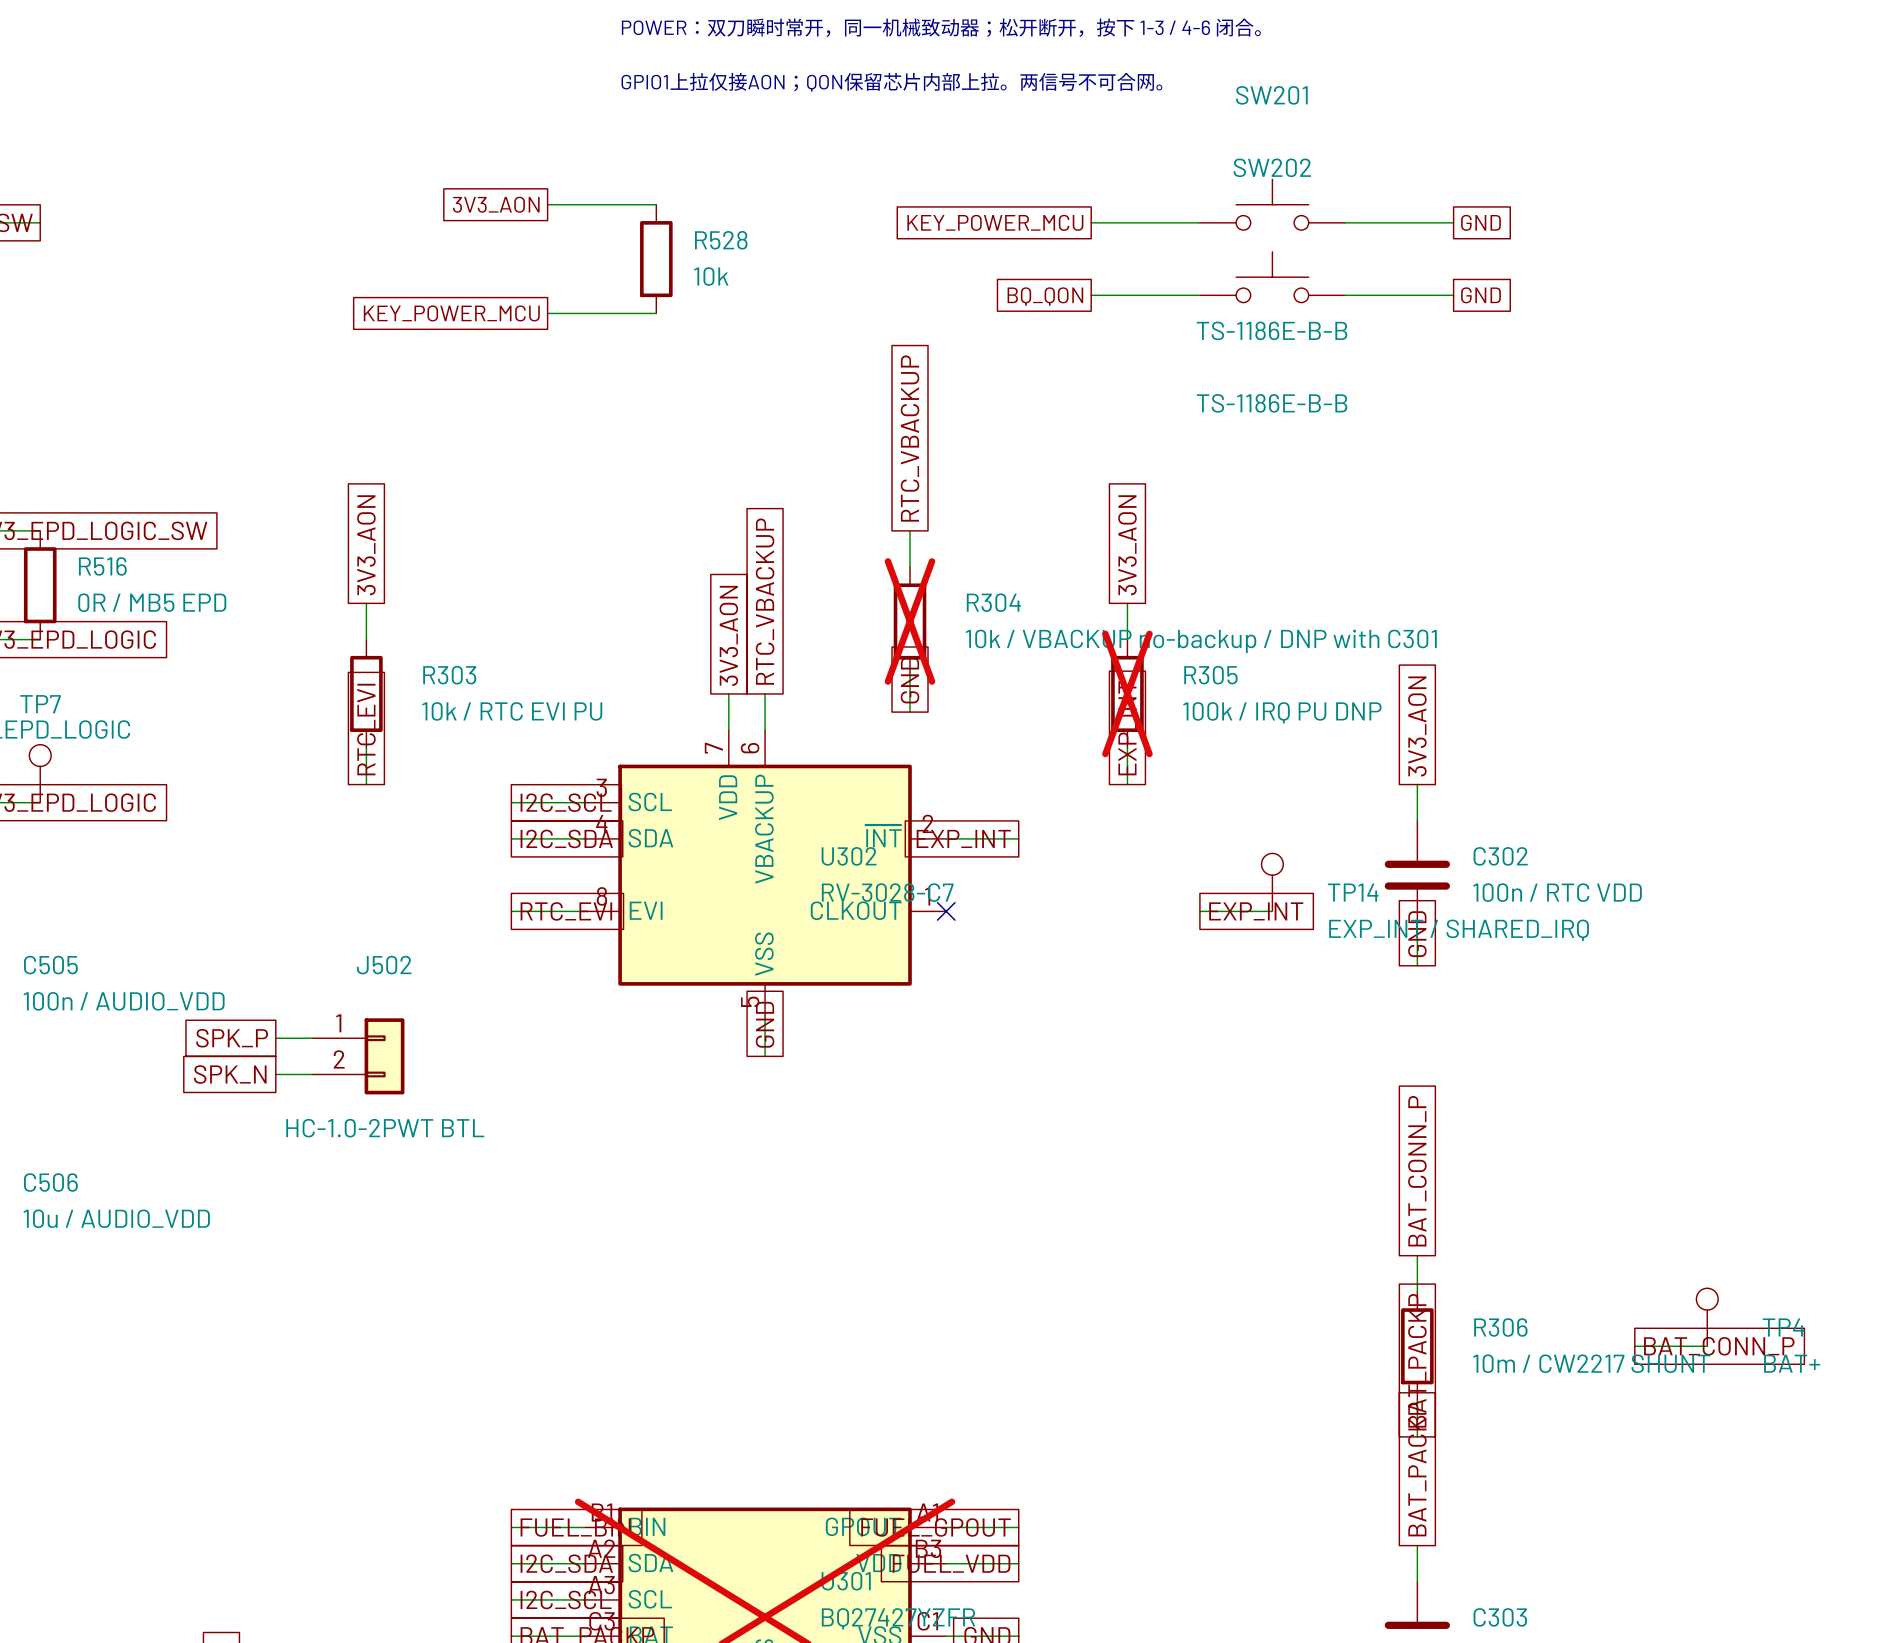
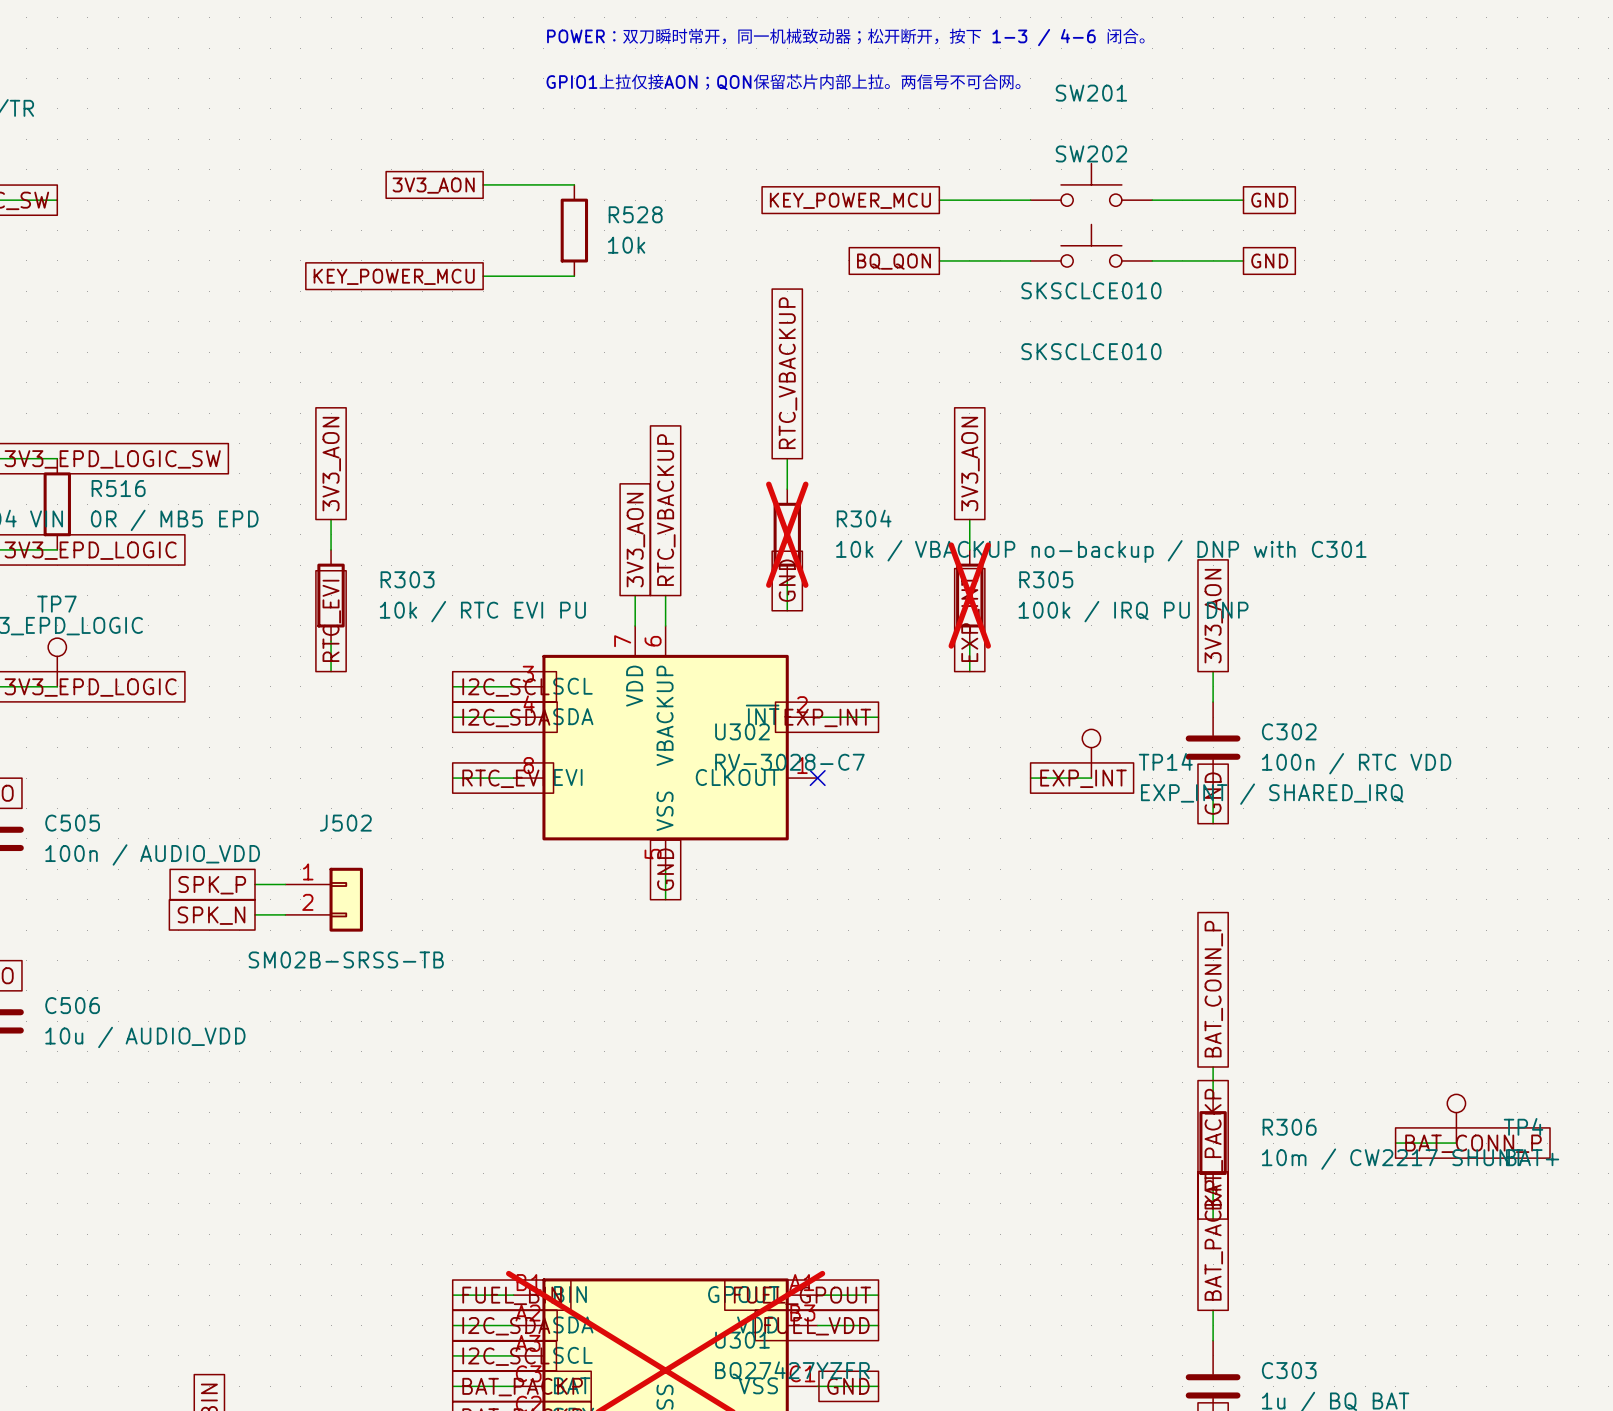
SW201 value: TS-1186E-B-B (1272, 330) -> SKSCLCE010 (1091, 290)
SW202 value: TS-1186E-B-B (1272, 403) -> SKSCLCE010 (1091, 351)
J502 value: HC-1.0-2PWT BTL (385, 1128) -> SM02B-SRSS-TB (346, 959)

